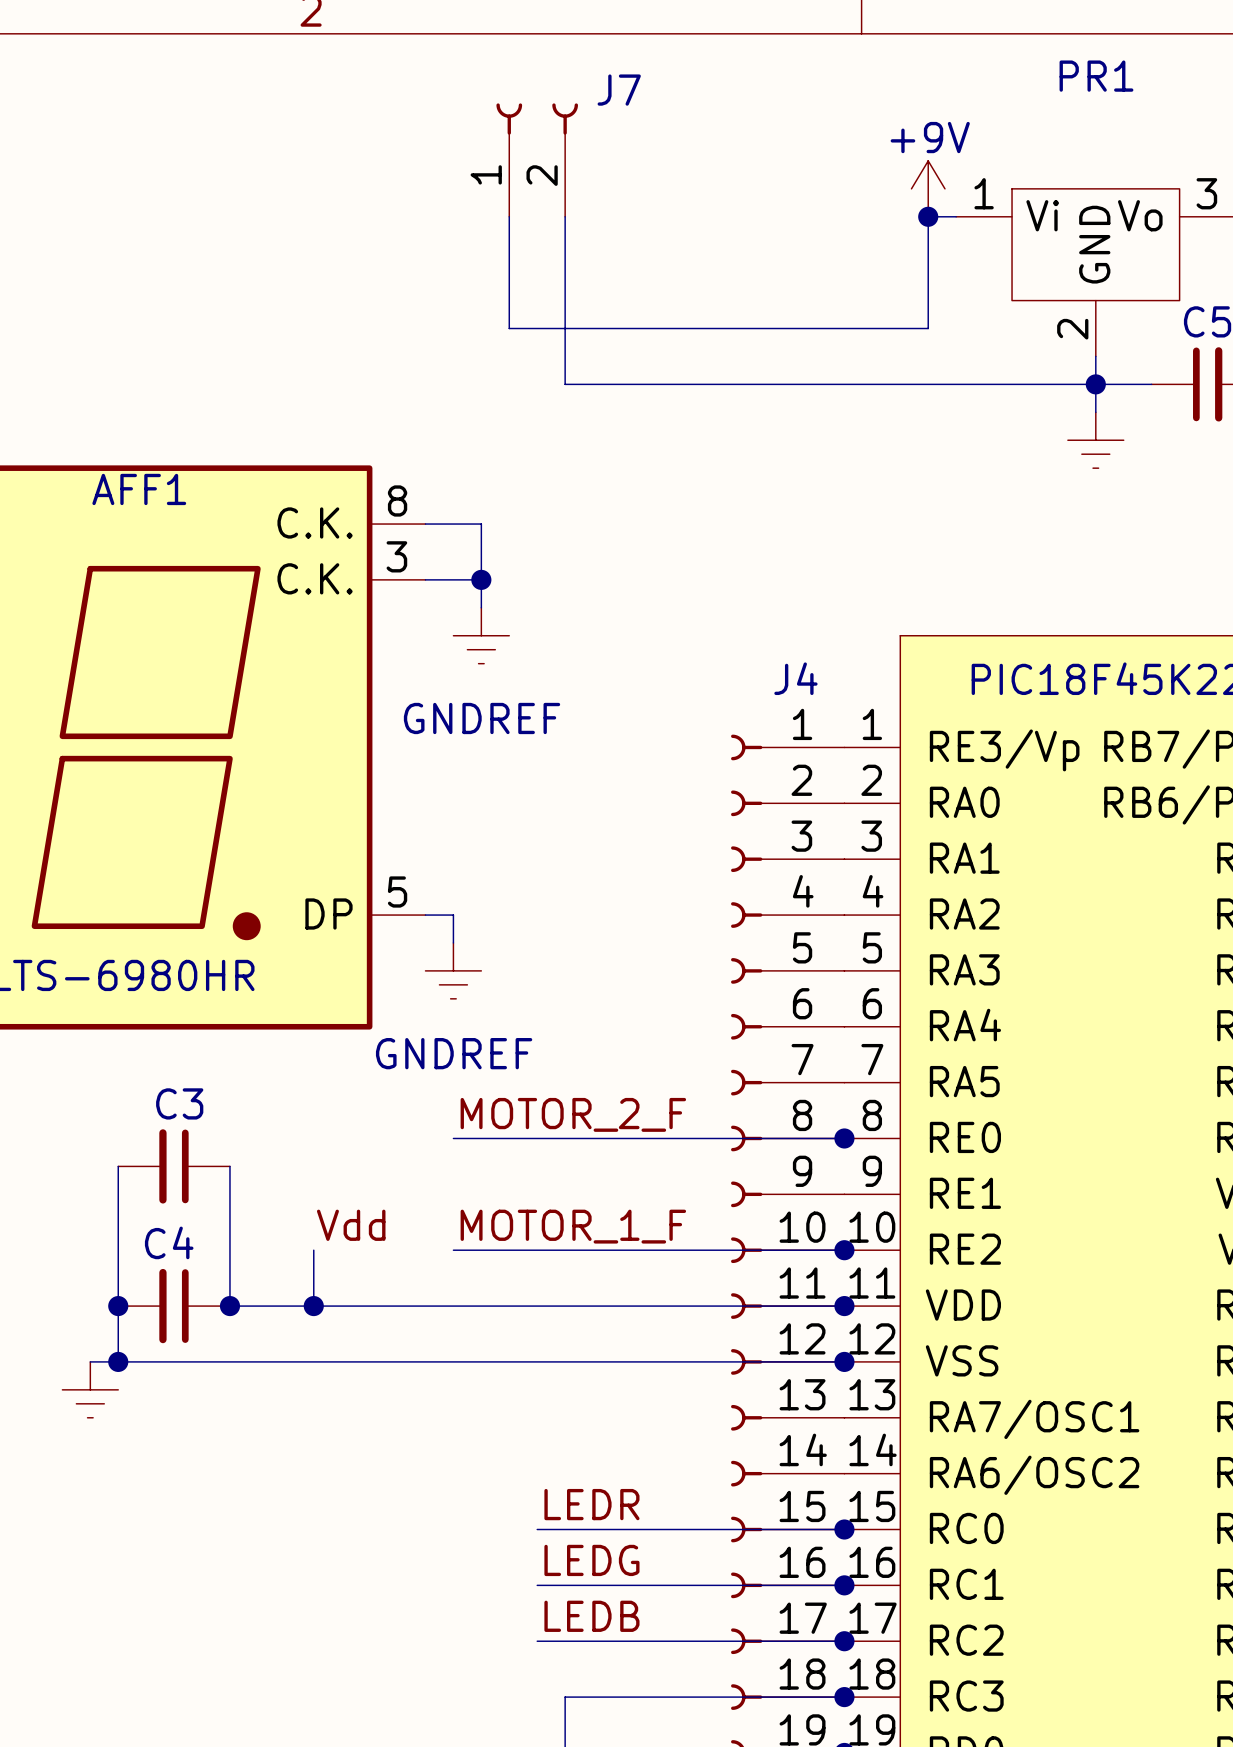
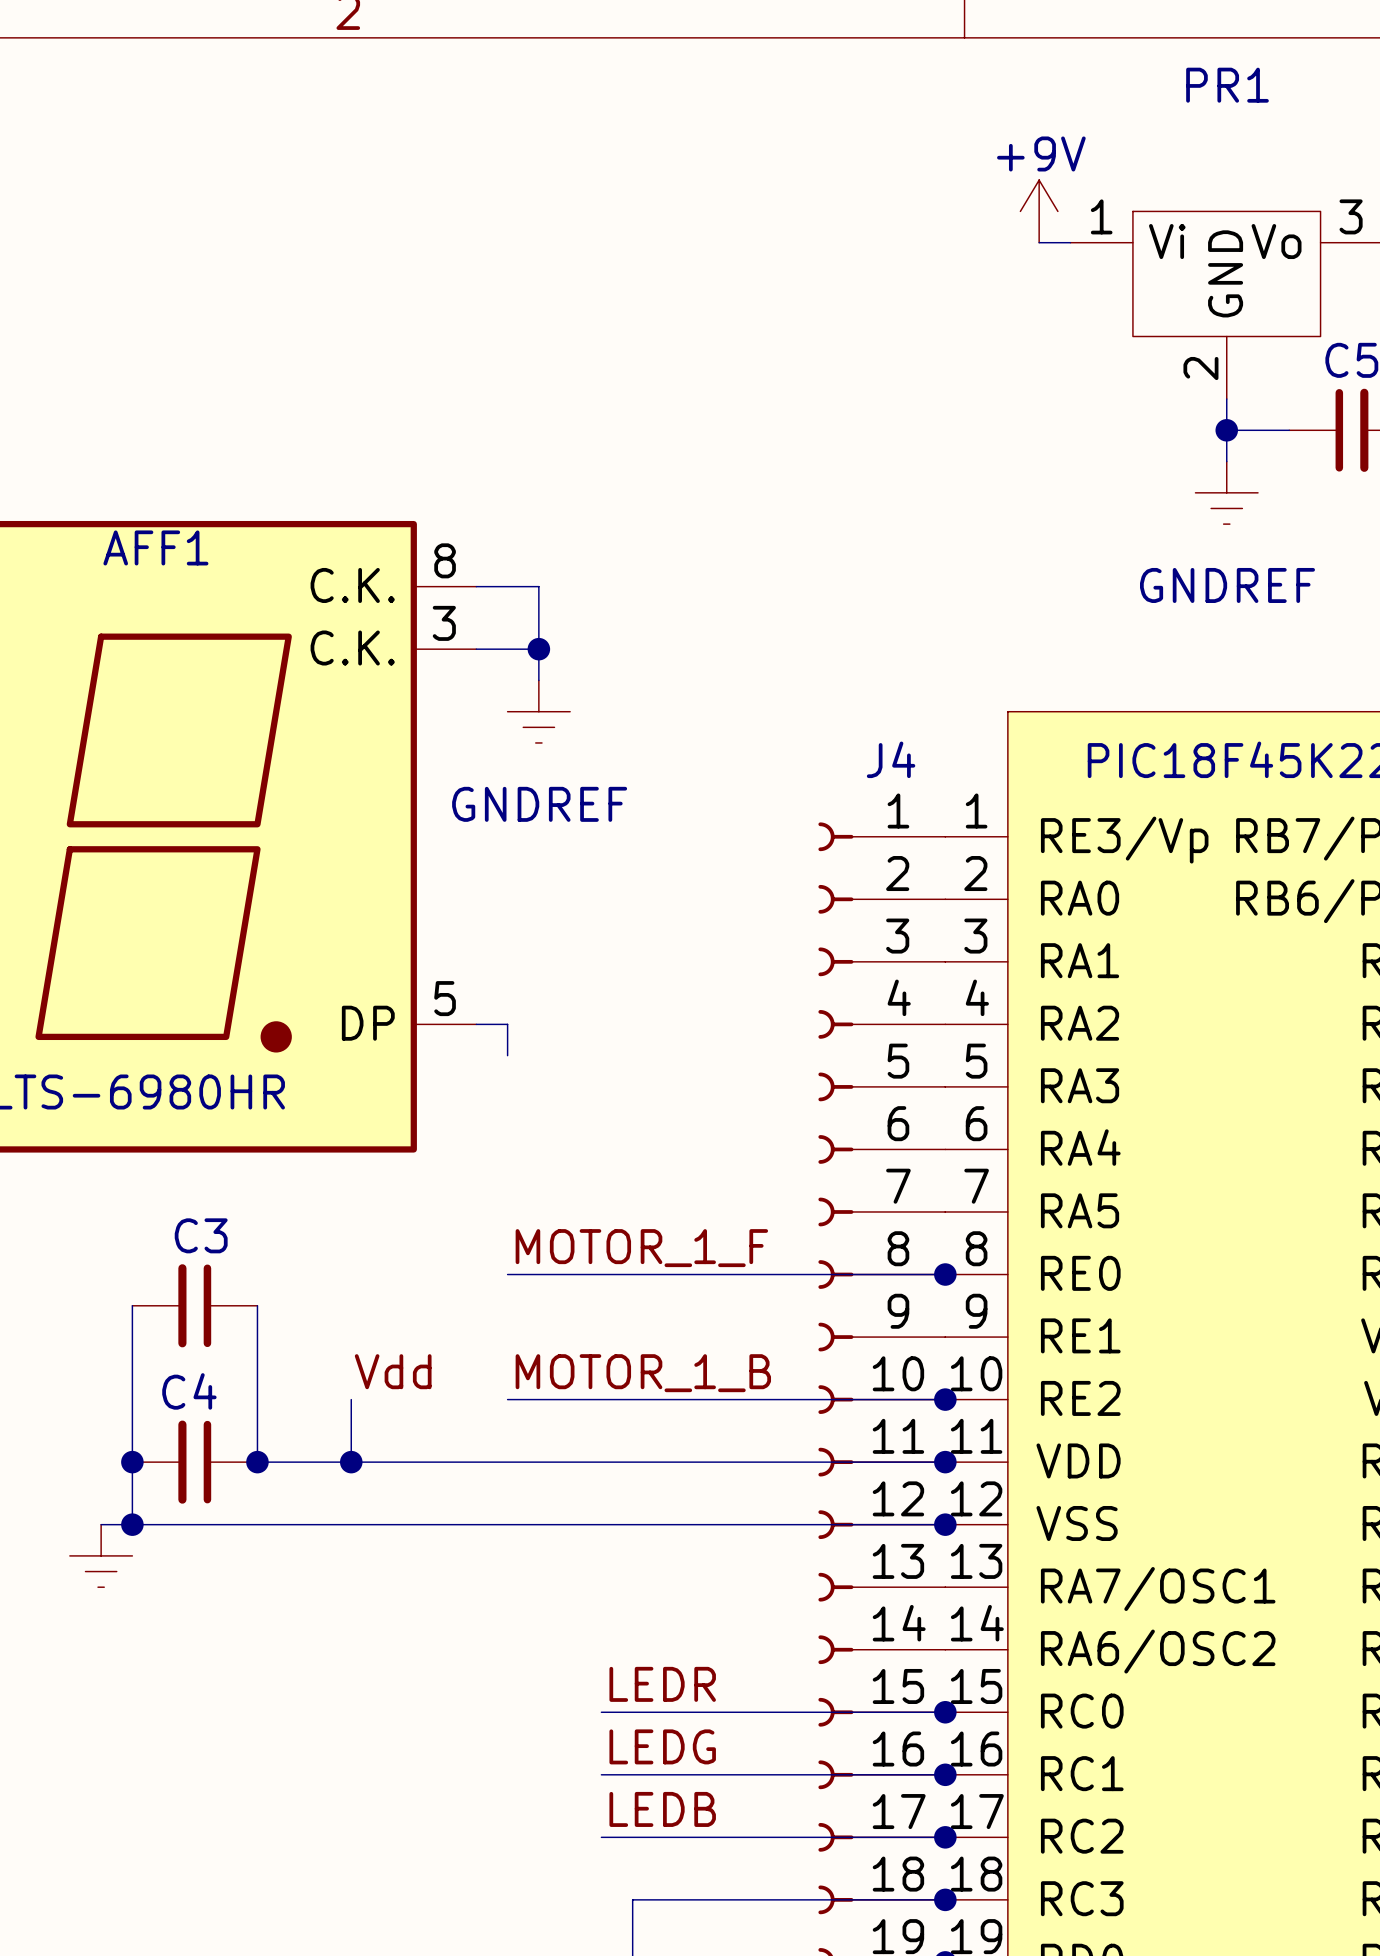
J7: (537, 160) -> none
wire: (509, 216) (509, 328) (928, 328) (928, 216) -> none
wire: (565, 216) (565, 384) (1095, 384) -> none
junction: (928, 216) -> none
power symbol text: none -> GNDREF (1227, 585)
power symbol: GNDREF (453, 970) -> none
label: MOTOR_2_F (573, 1114) -> MOTOR_1_F (641, 1248)
label: MOTOR_1_F (573, 1226) -> MOTOR_1_B (643, 1373)

